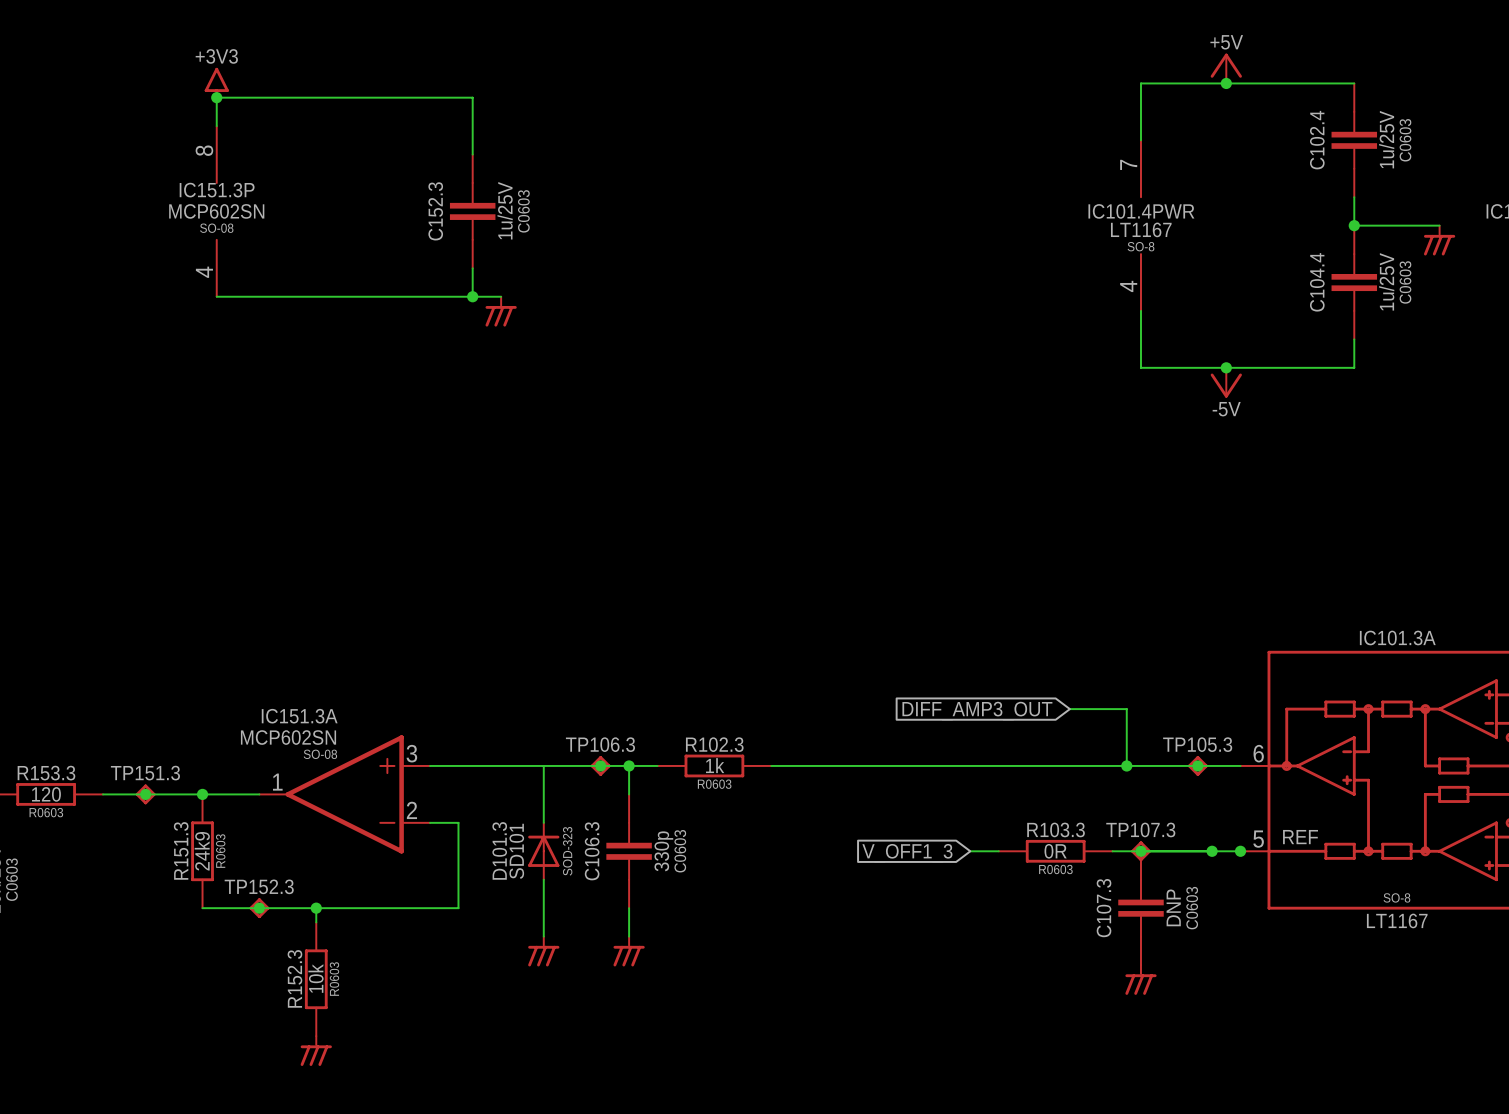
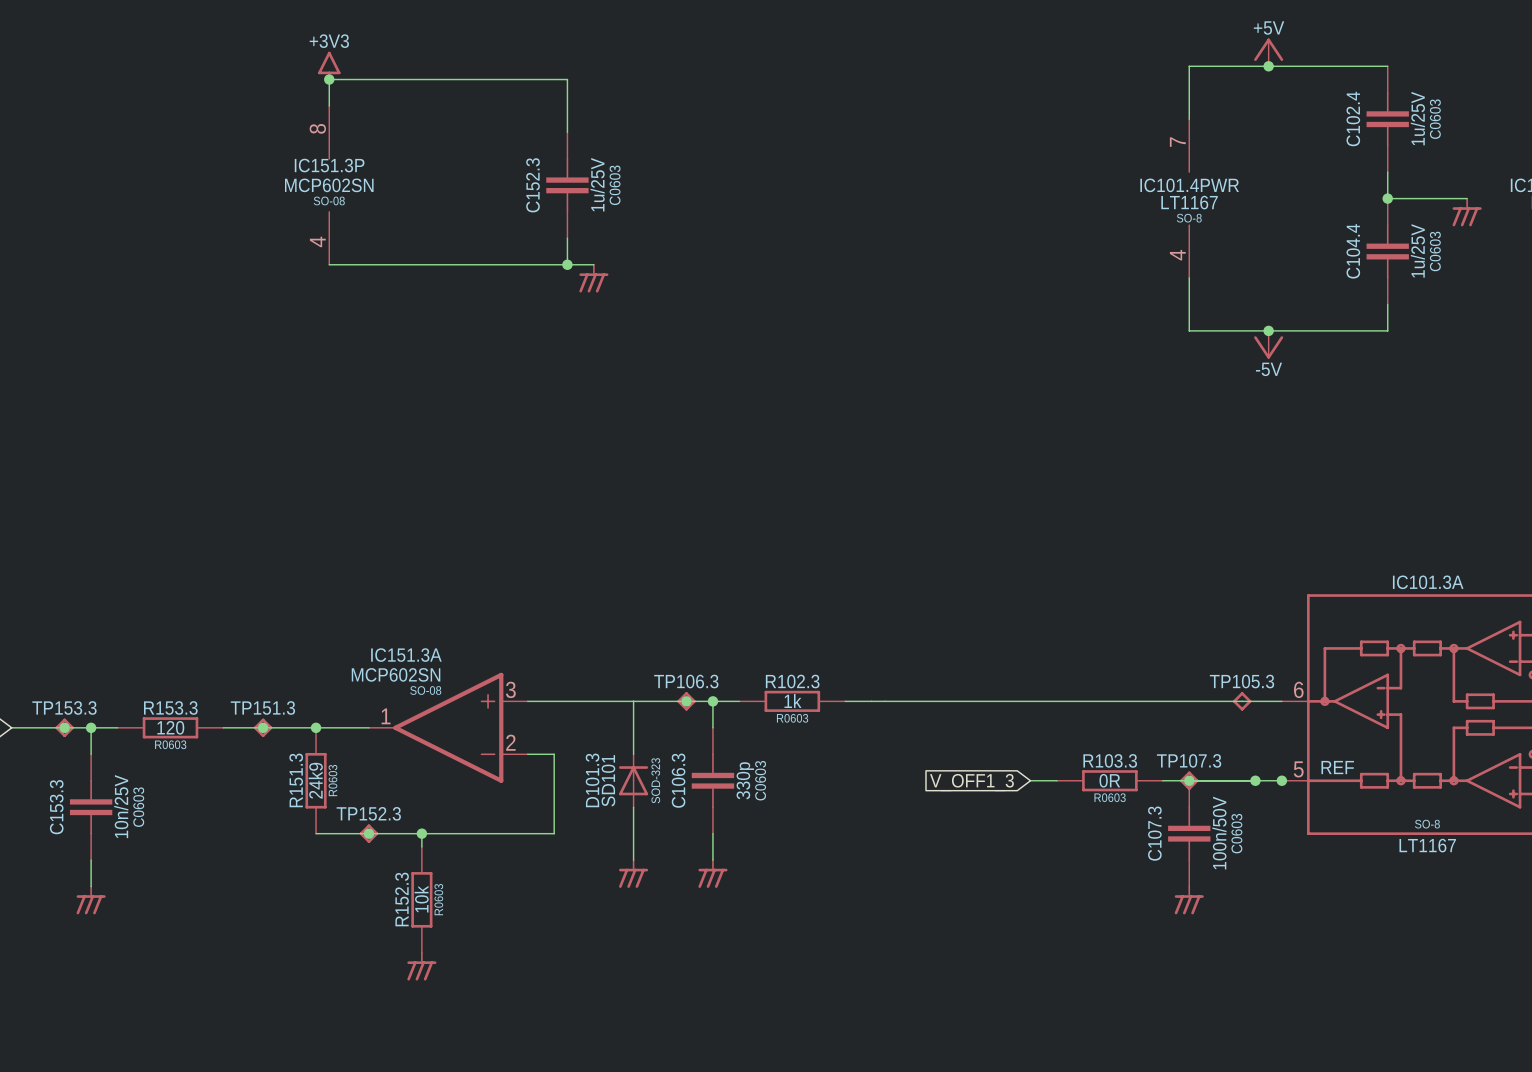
wire: (1069, 709) (1126, 709) (1126, 765) -> none
global label: DIFF_AMP3_OUT (977, 711) -> none
junction: (1126, 765) -> none
junction: (1197, 765) -> none
C107.3 value: DNP (1173, 907) -> 100n/50V (1219, 833)

